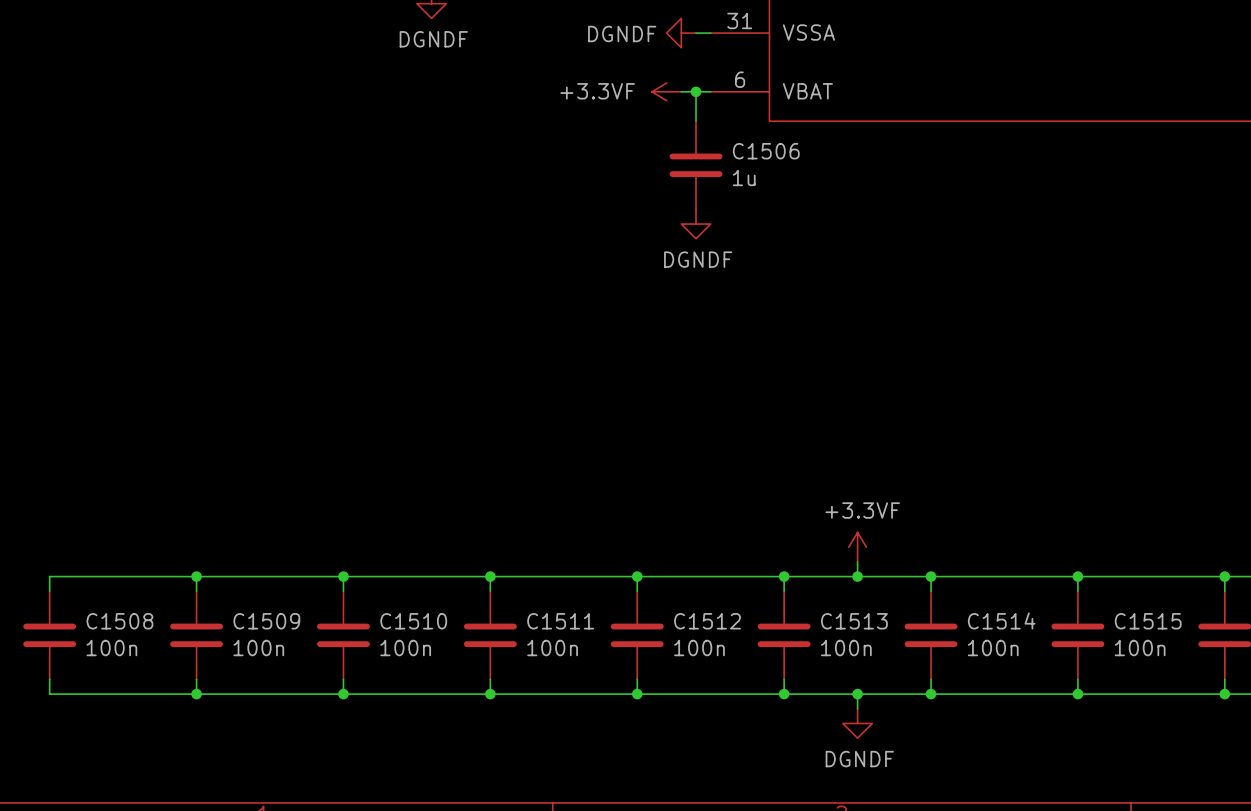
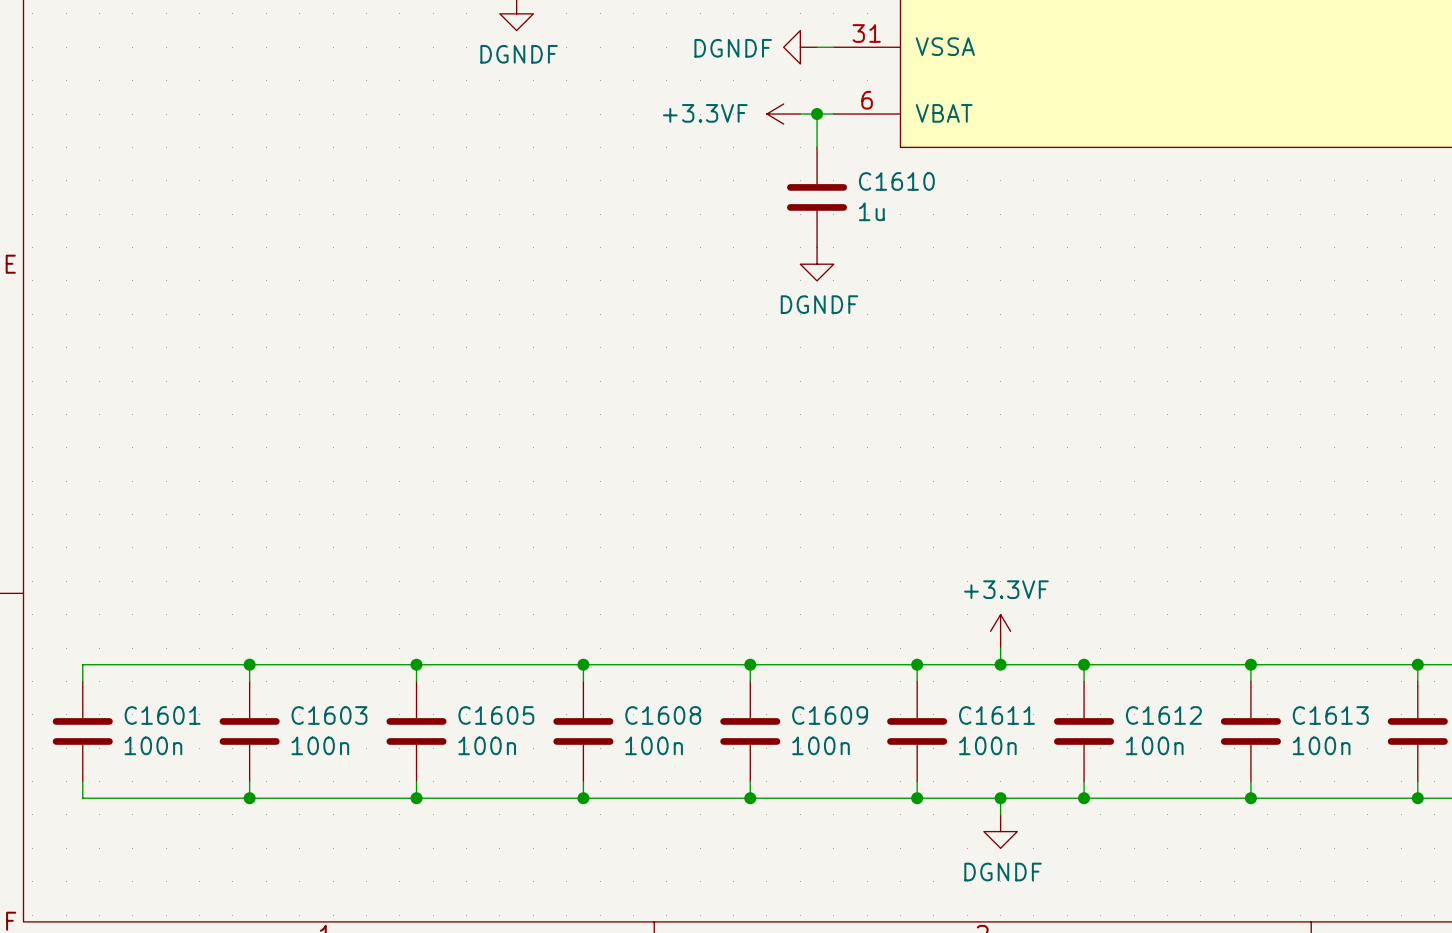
C1506 name: C1506 (766, 151) -> C1610 (896, 181)
C1514 name: C1514 (1001, 620) -> C1612 (1163, 715)
C1508 name: C1508 (119, 621) -> C1601 (162, 715)
C1509 name: C1509 (266, 621) -> C1603 (329, 715)
C1510 name: C1510 (413, 621) -> C1605 (496, 715)
C1511 name: C1511 (560, 621) -> C1608 (663, 715)
C1512 name: C1512 (707, 621) -> C1609 (830, 715)
C1513 name: C1513 (854, 621) -> C1611 (996, 715)
C1515 name: C1515 (1148, 621) -> C1613 (1330, 715)

